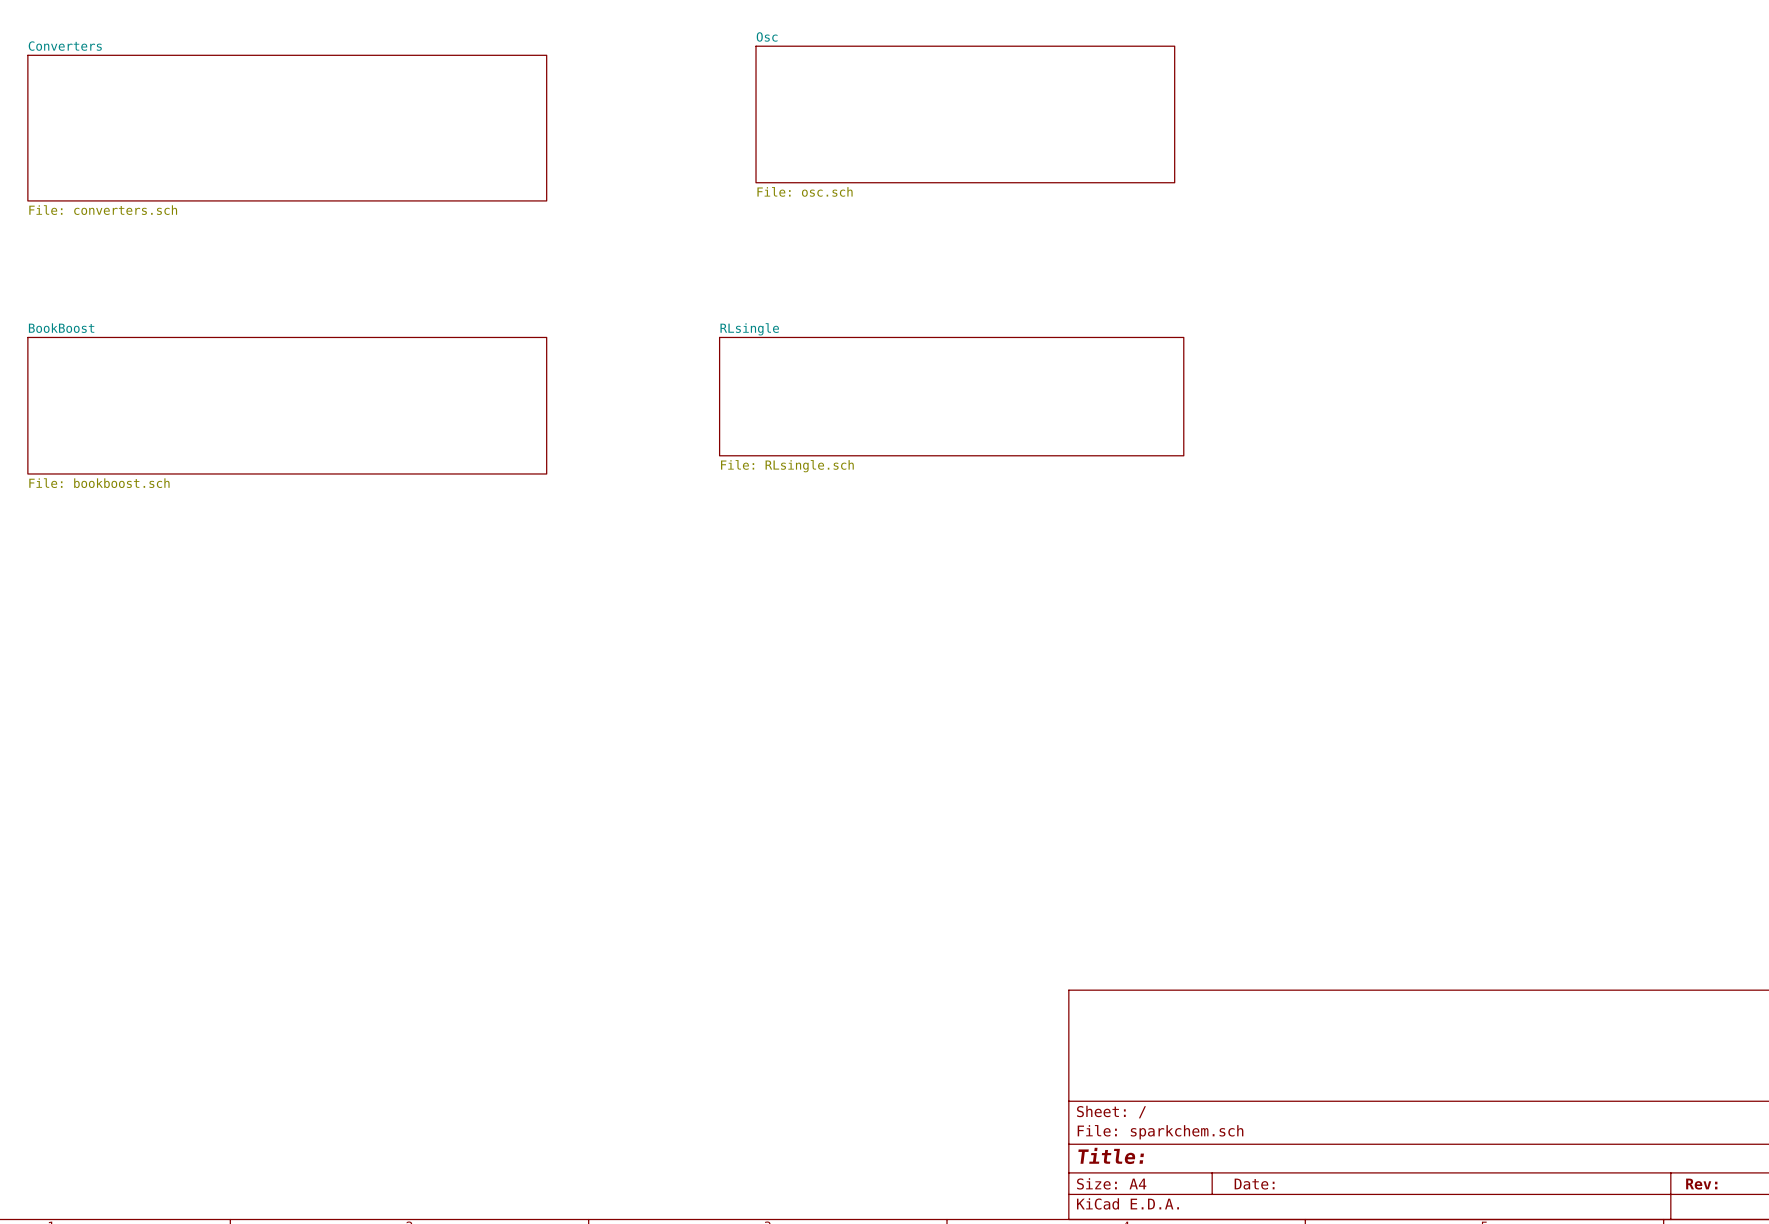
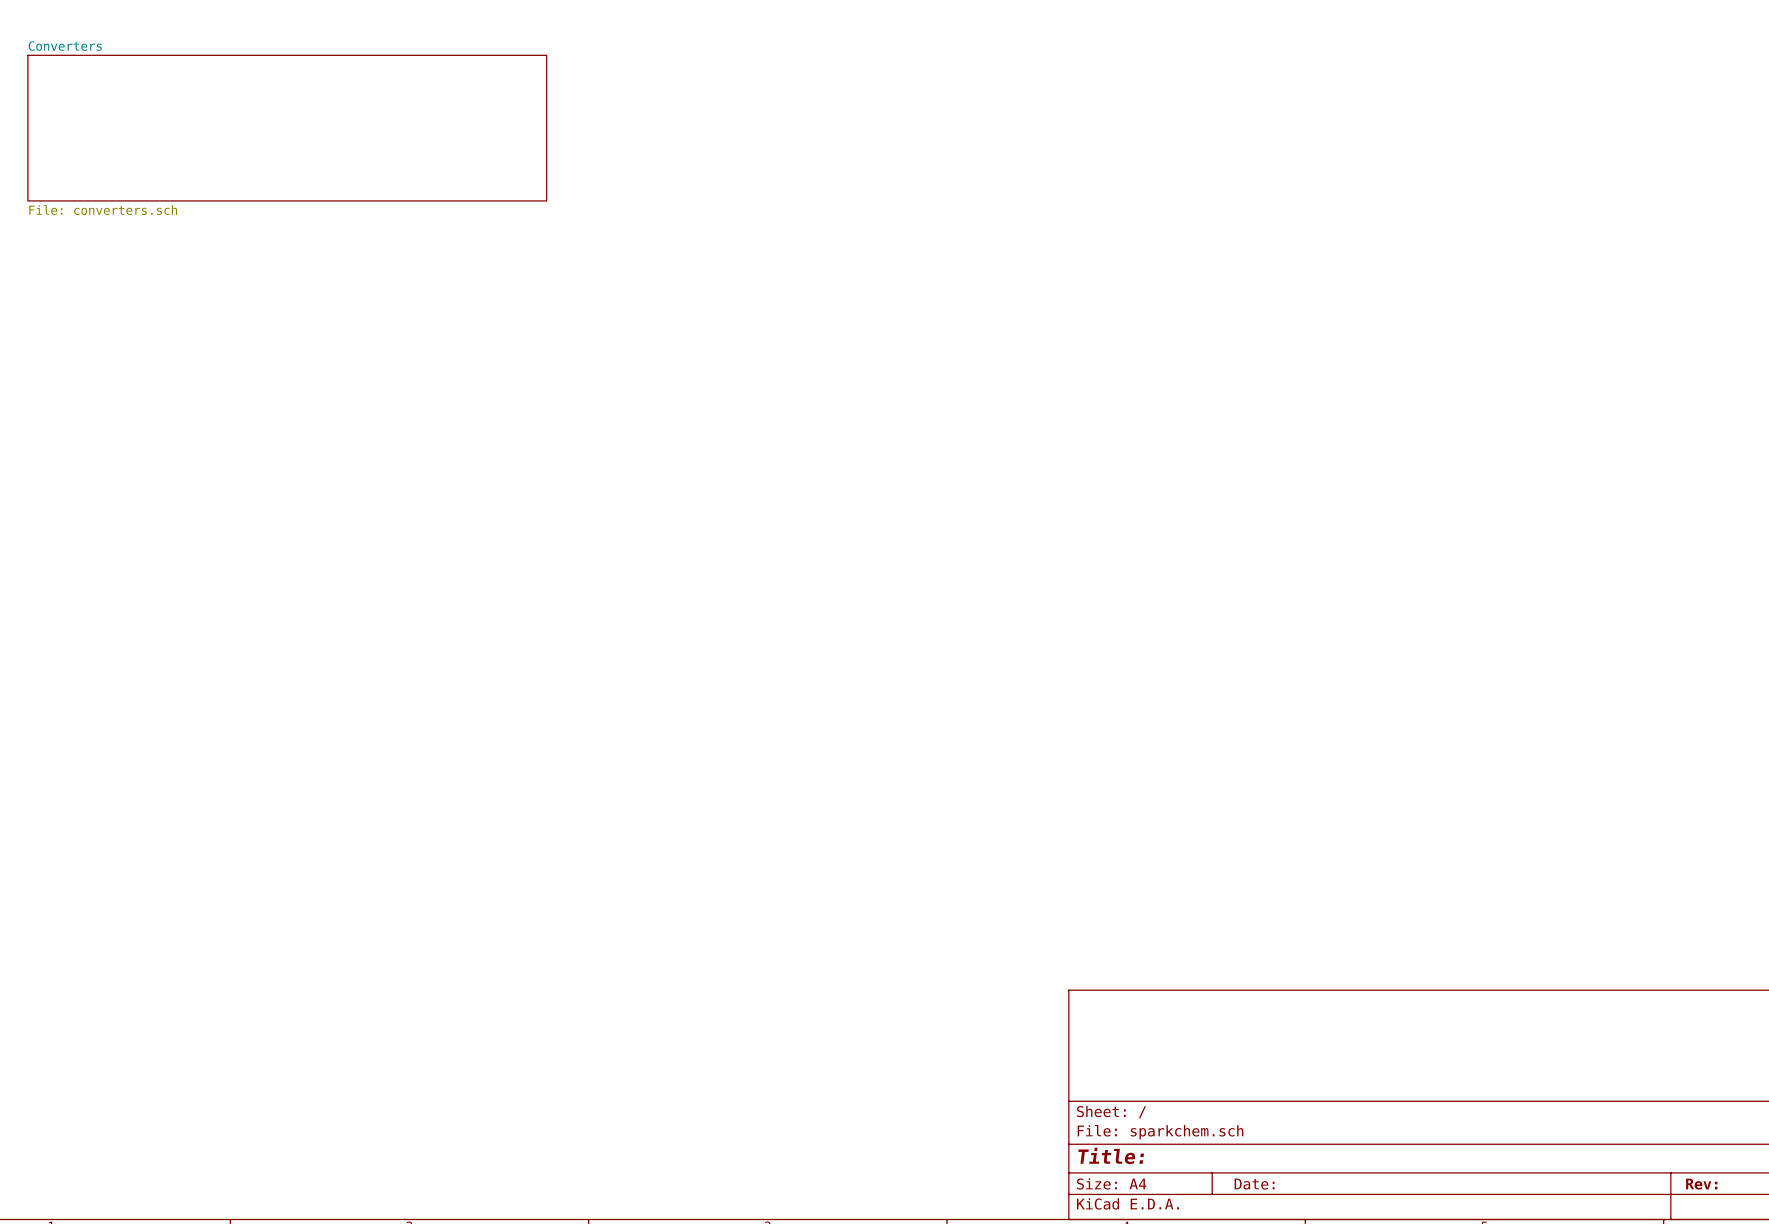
sheet Osc: File: osc.sch (965, 114) -> none
sheet RLsingle: File: RLsingle.sch (951, 396) -> none
sheet BookBoost: File: bookboost.sch (287, 405) -> none

